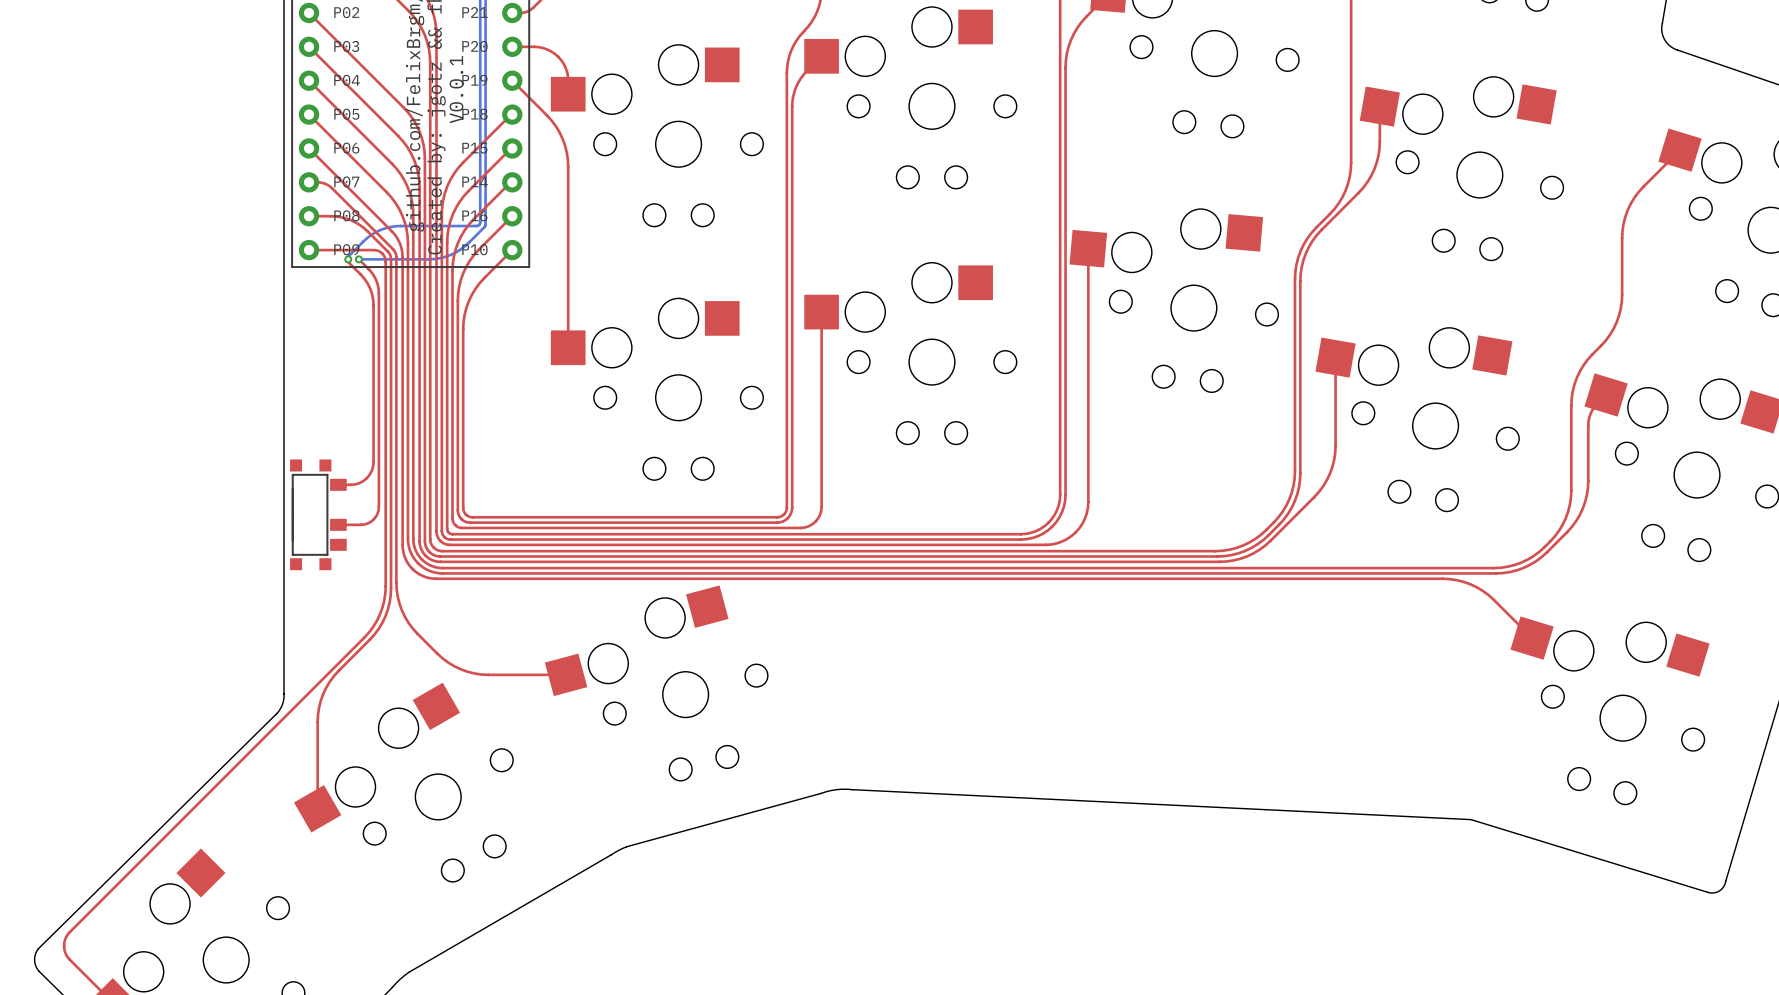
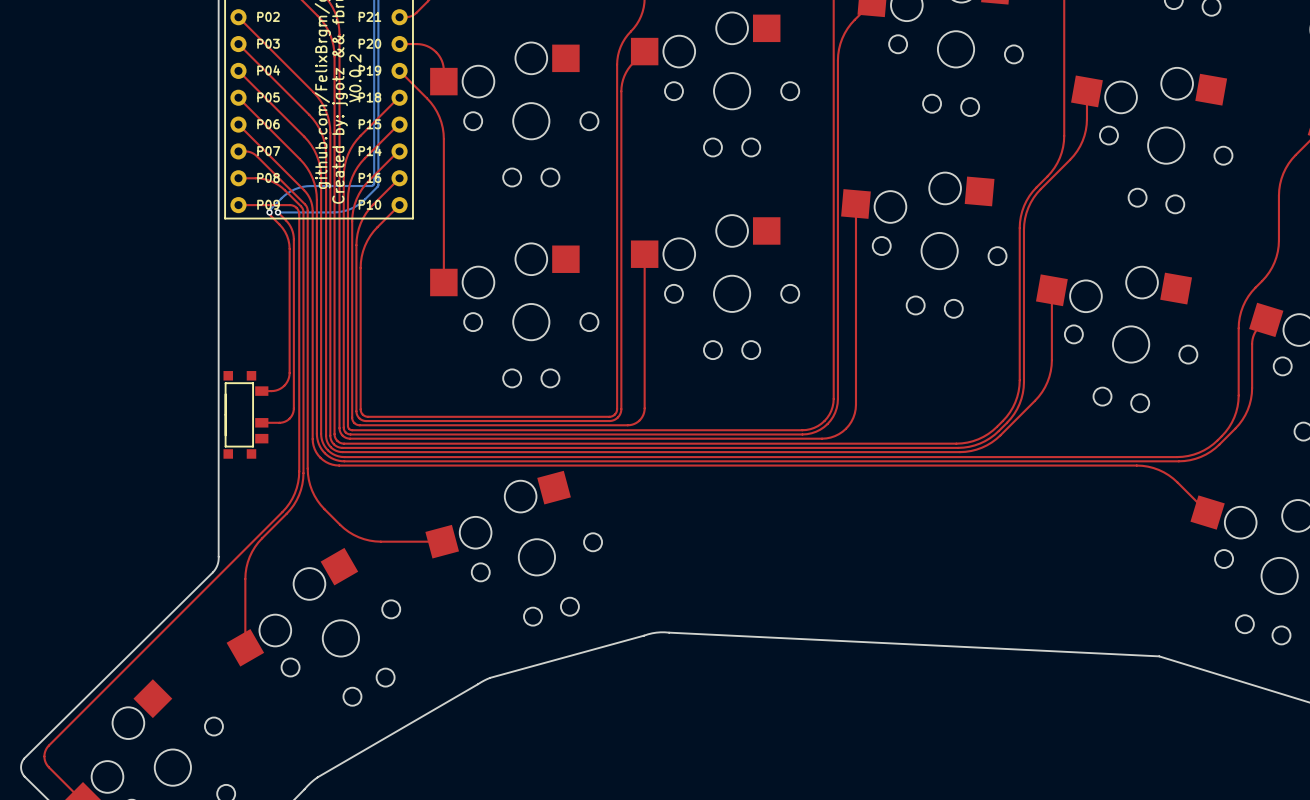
text: V0.0.1 (456, 89) -> V0.0.2 (355, 78)

